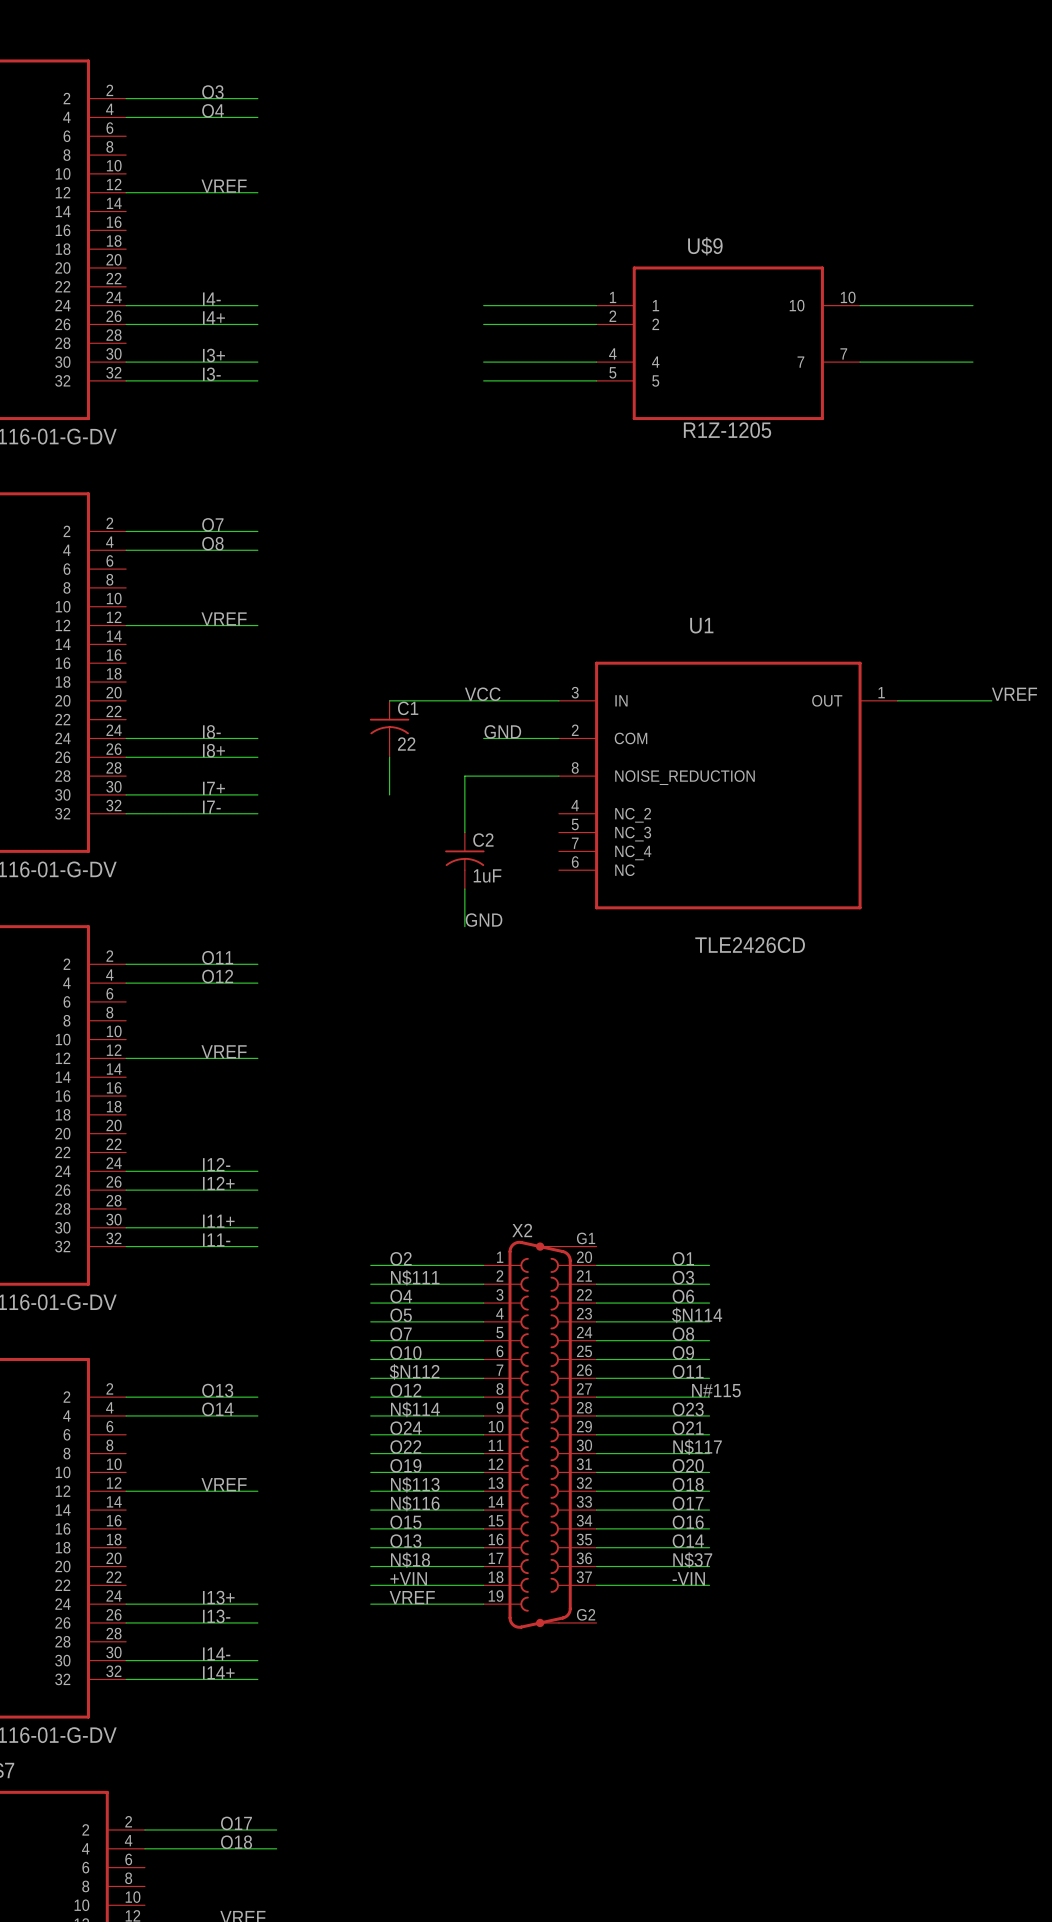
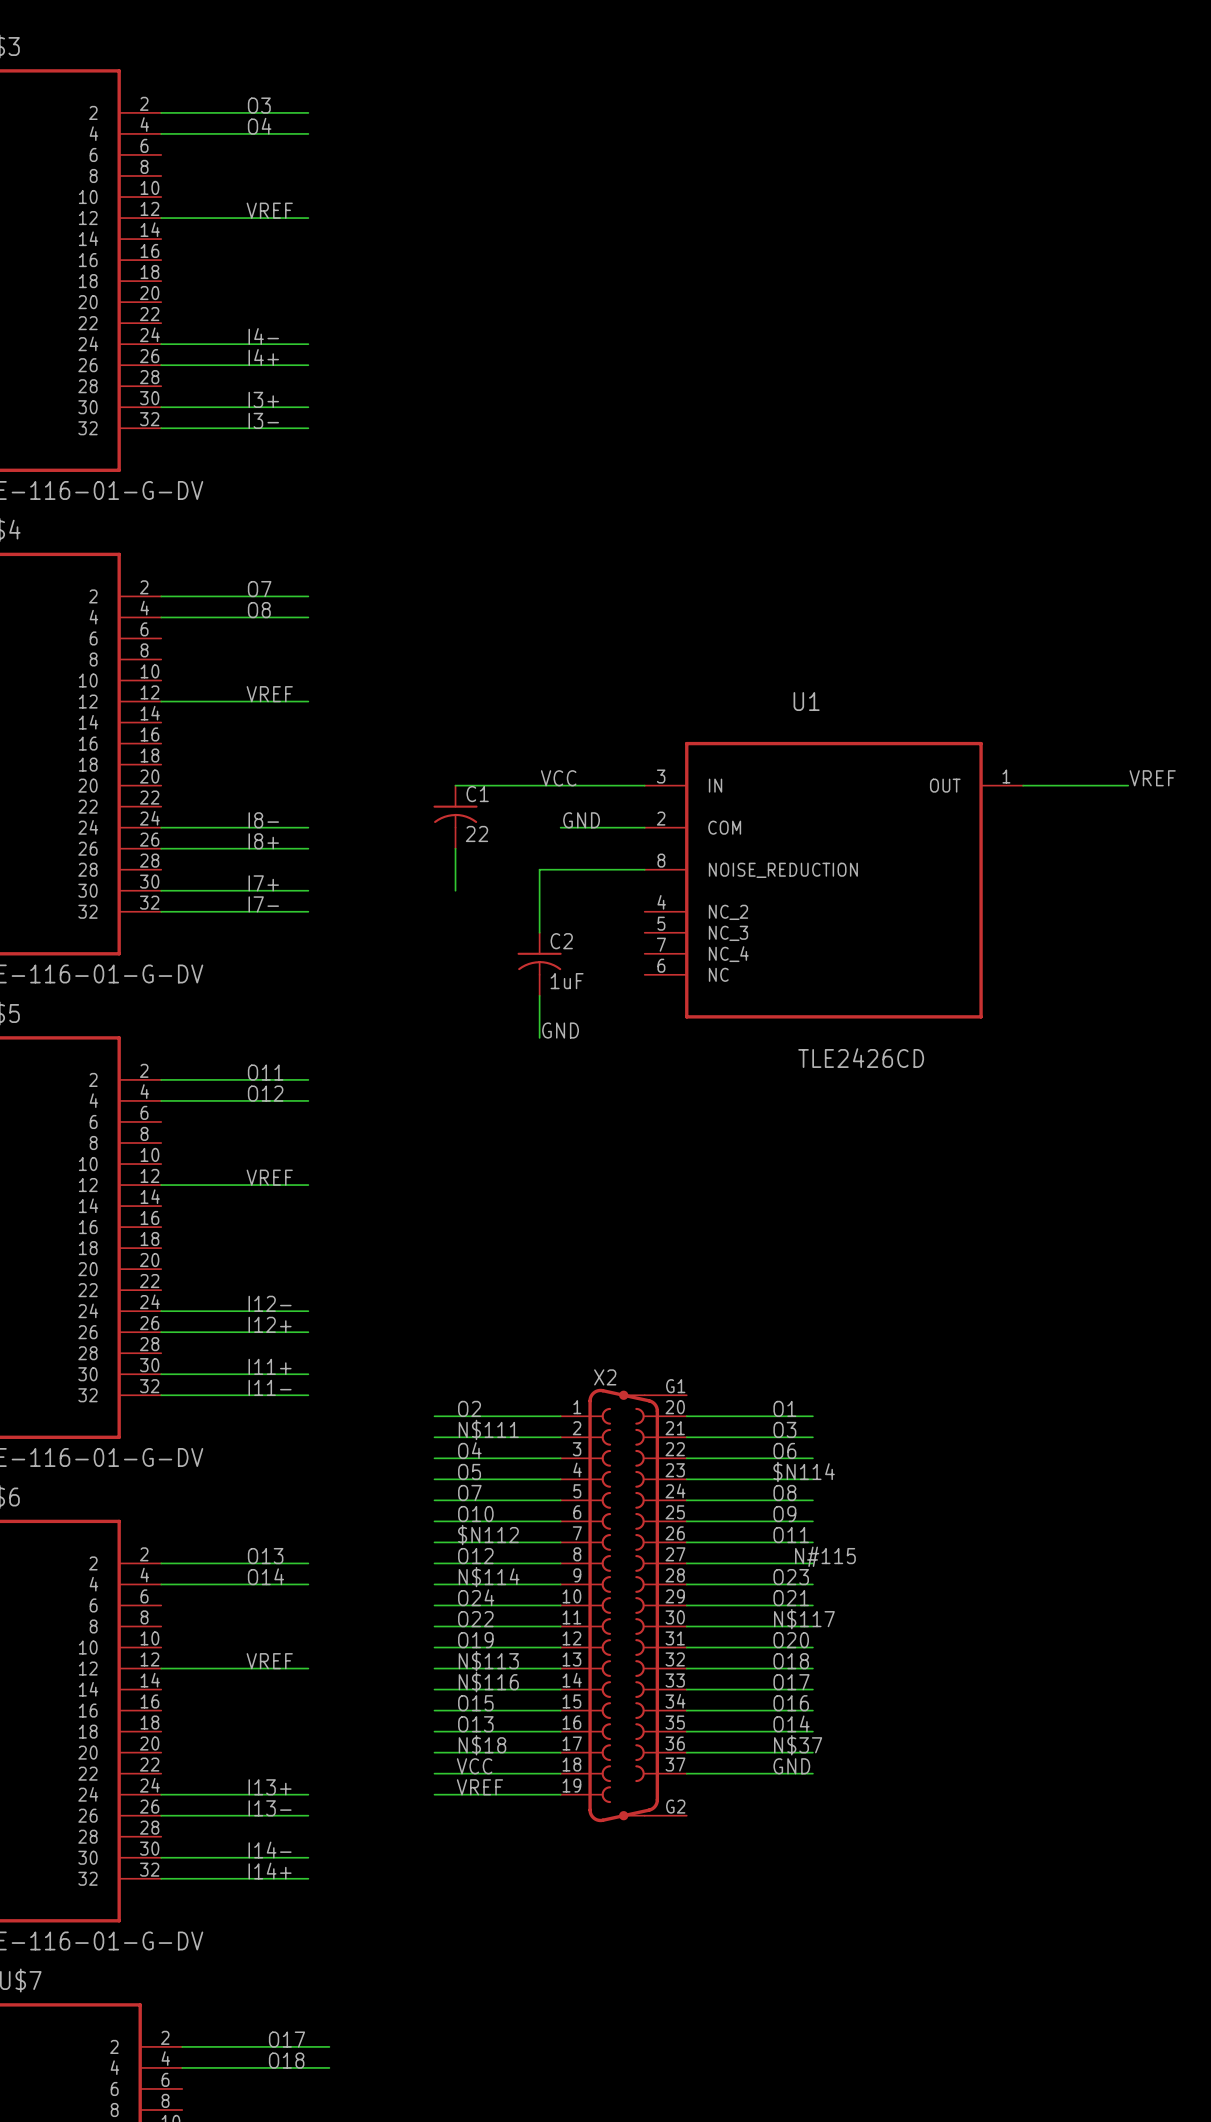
wire: (483, 305) (596, 305) -> none
wire: (860, 305) (972, 305) -> none
wire: (483, 324) (596, 324) -> none
U$9: R1Z-1205 (728, 343) -> none
wire: (483, 362) (596, 362) -> none
wire: (860, 362) (972, 362) -> none
wire: (483, 380) (596, 380) -> none
label: +VIN (408, 1578) -> VCC (474, 1766)
label: -VIN (688, 1578) -> GND (791, 1766)

